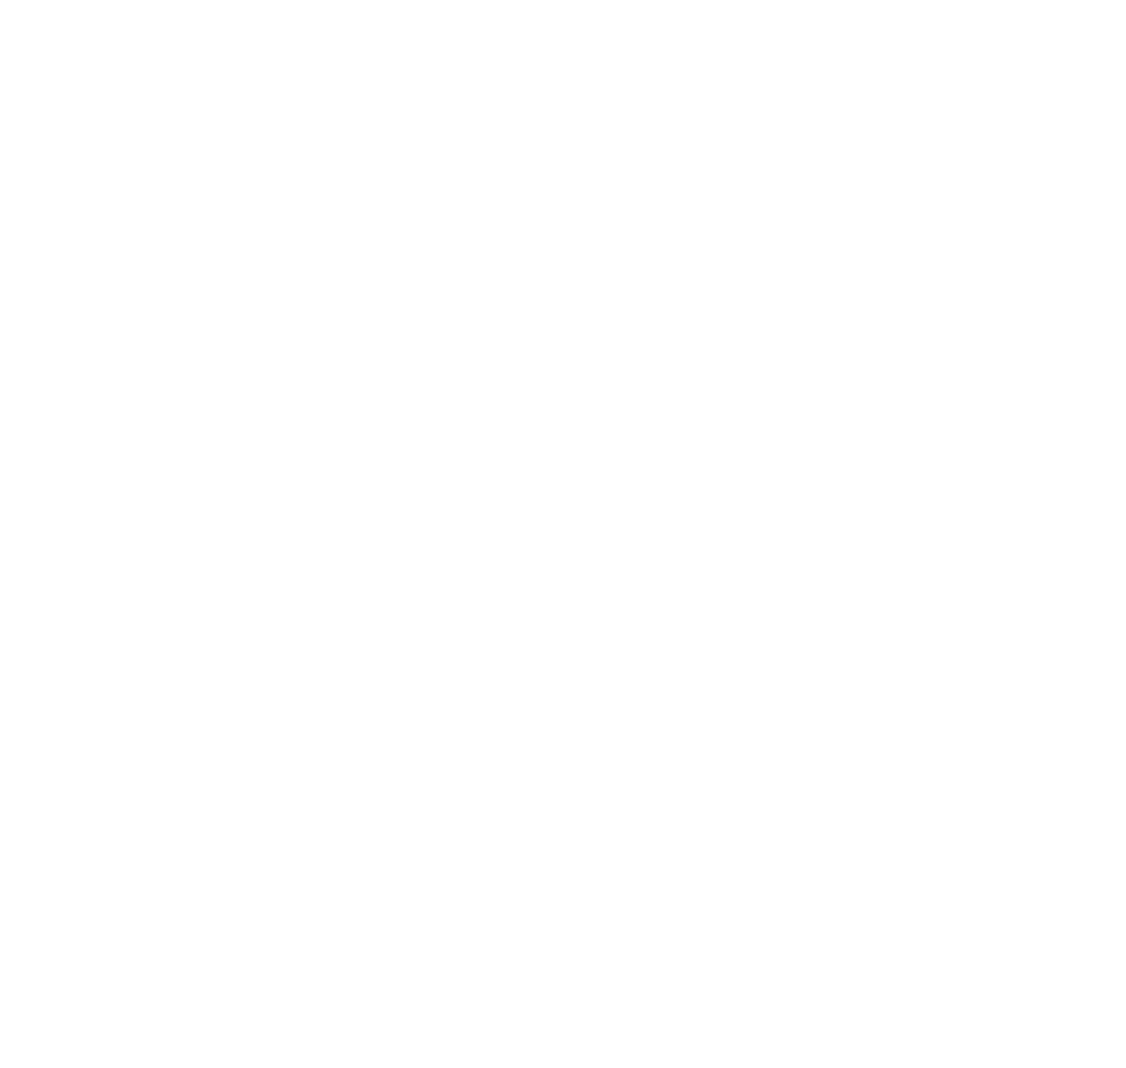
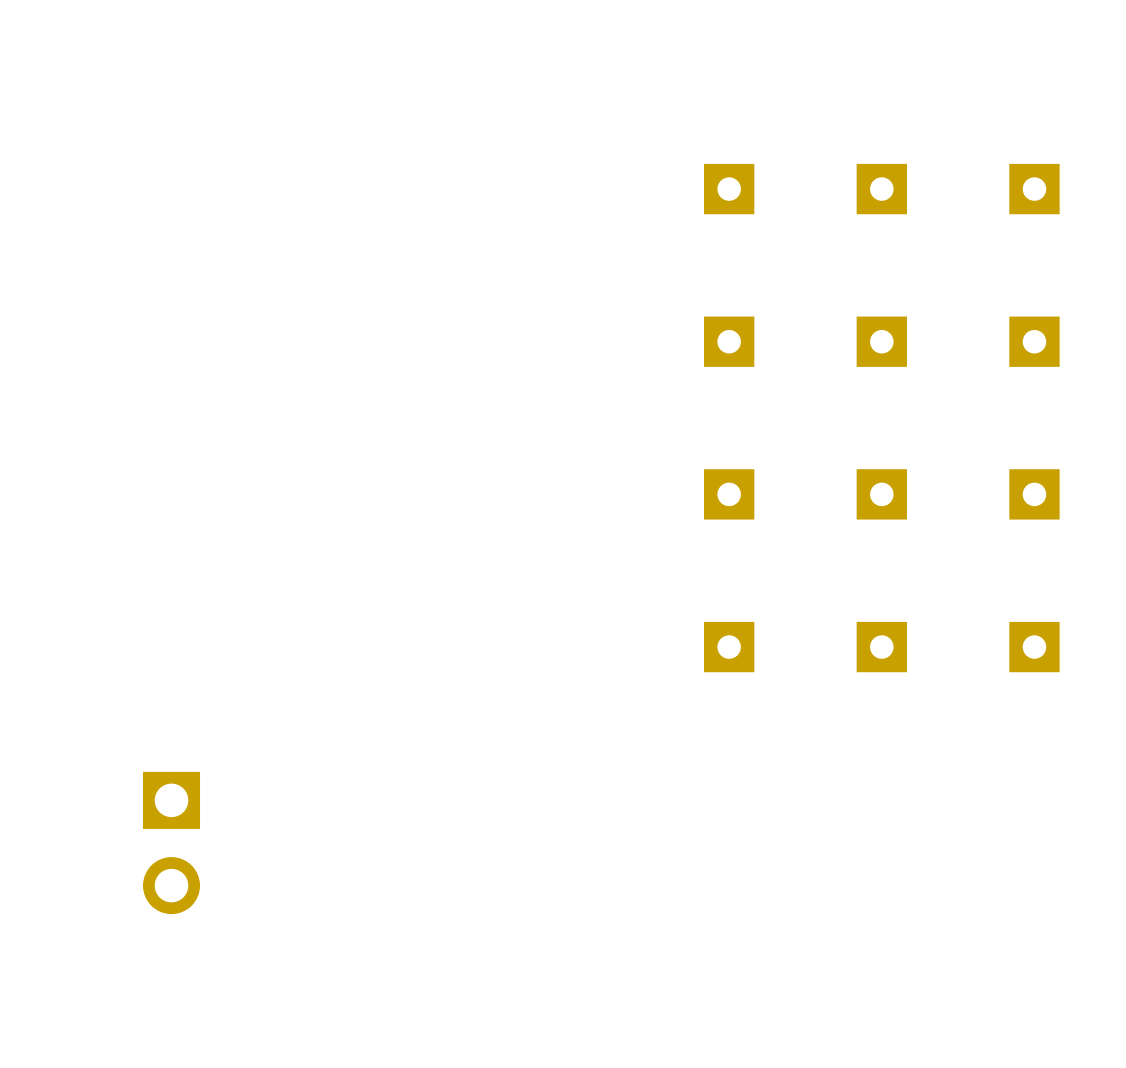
part: none -> (729, 189)
part: none -> (881, 189)
part: none -> (1034, 189)
part: none -> (729, 341)
part: none -> (881, 341)
part: none -> (1034, 341)
part: none -> (729, 494)
part: none -> (881, 494)
part: none -> (1034, 494)
part: none -> (729, 647)
part: none -> (881, 647)
part: none -> (1034, 647)
part: none -> (171, 843)

